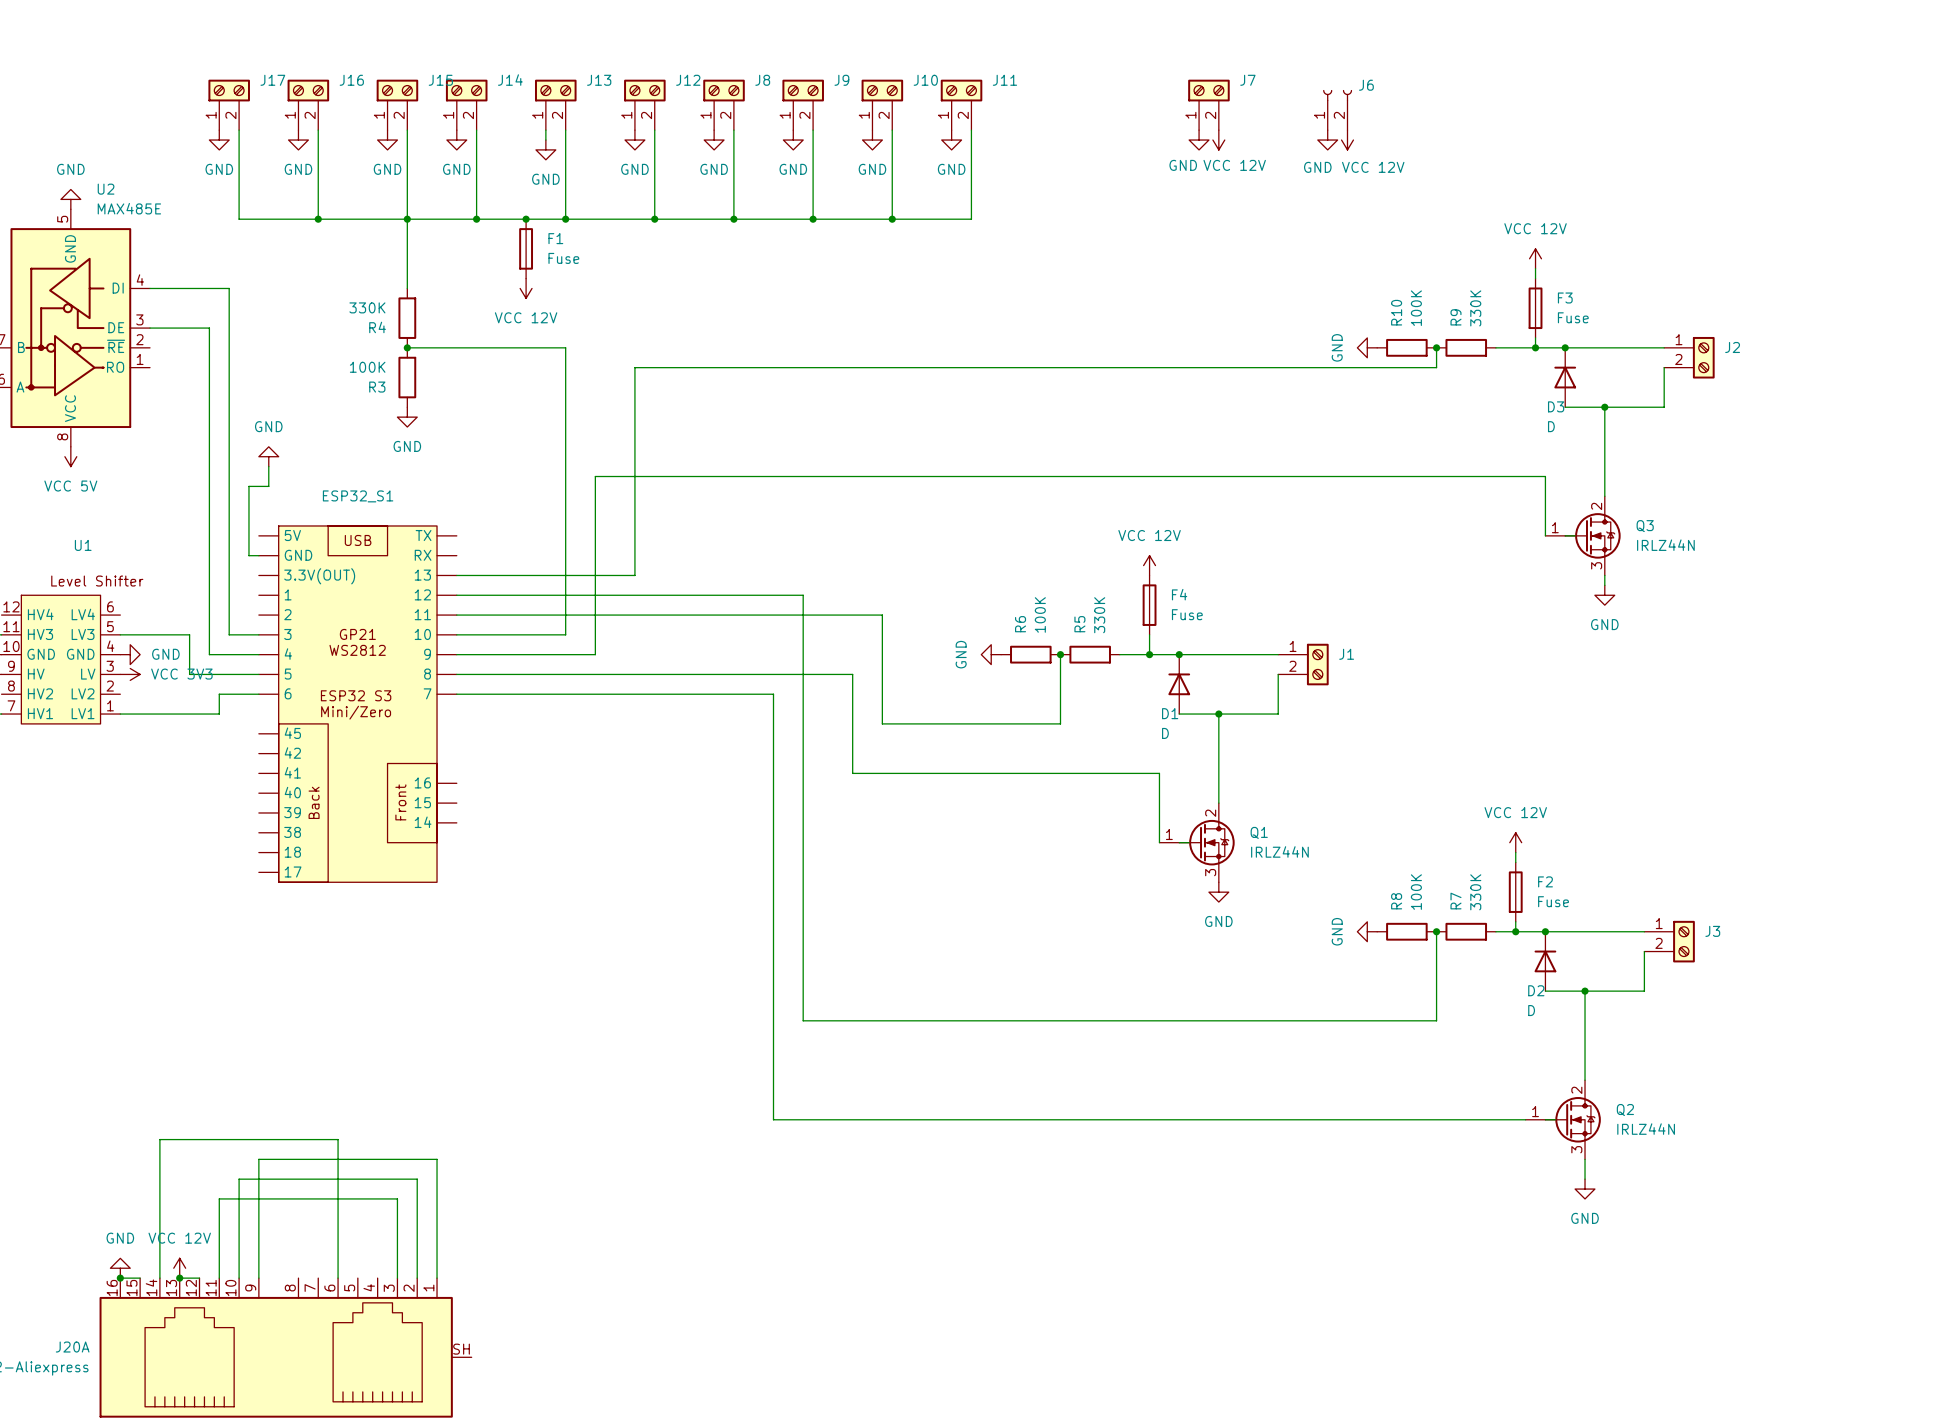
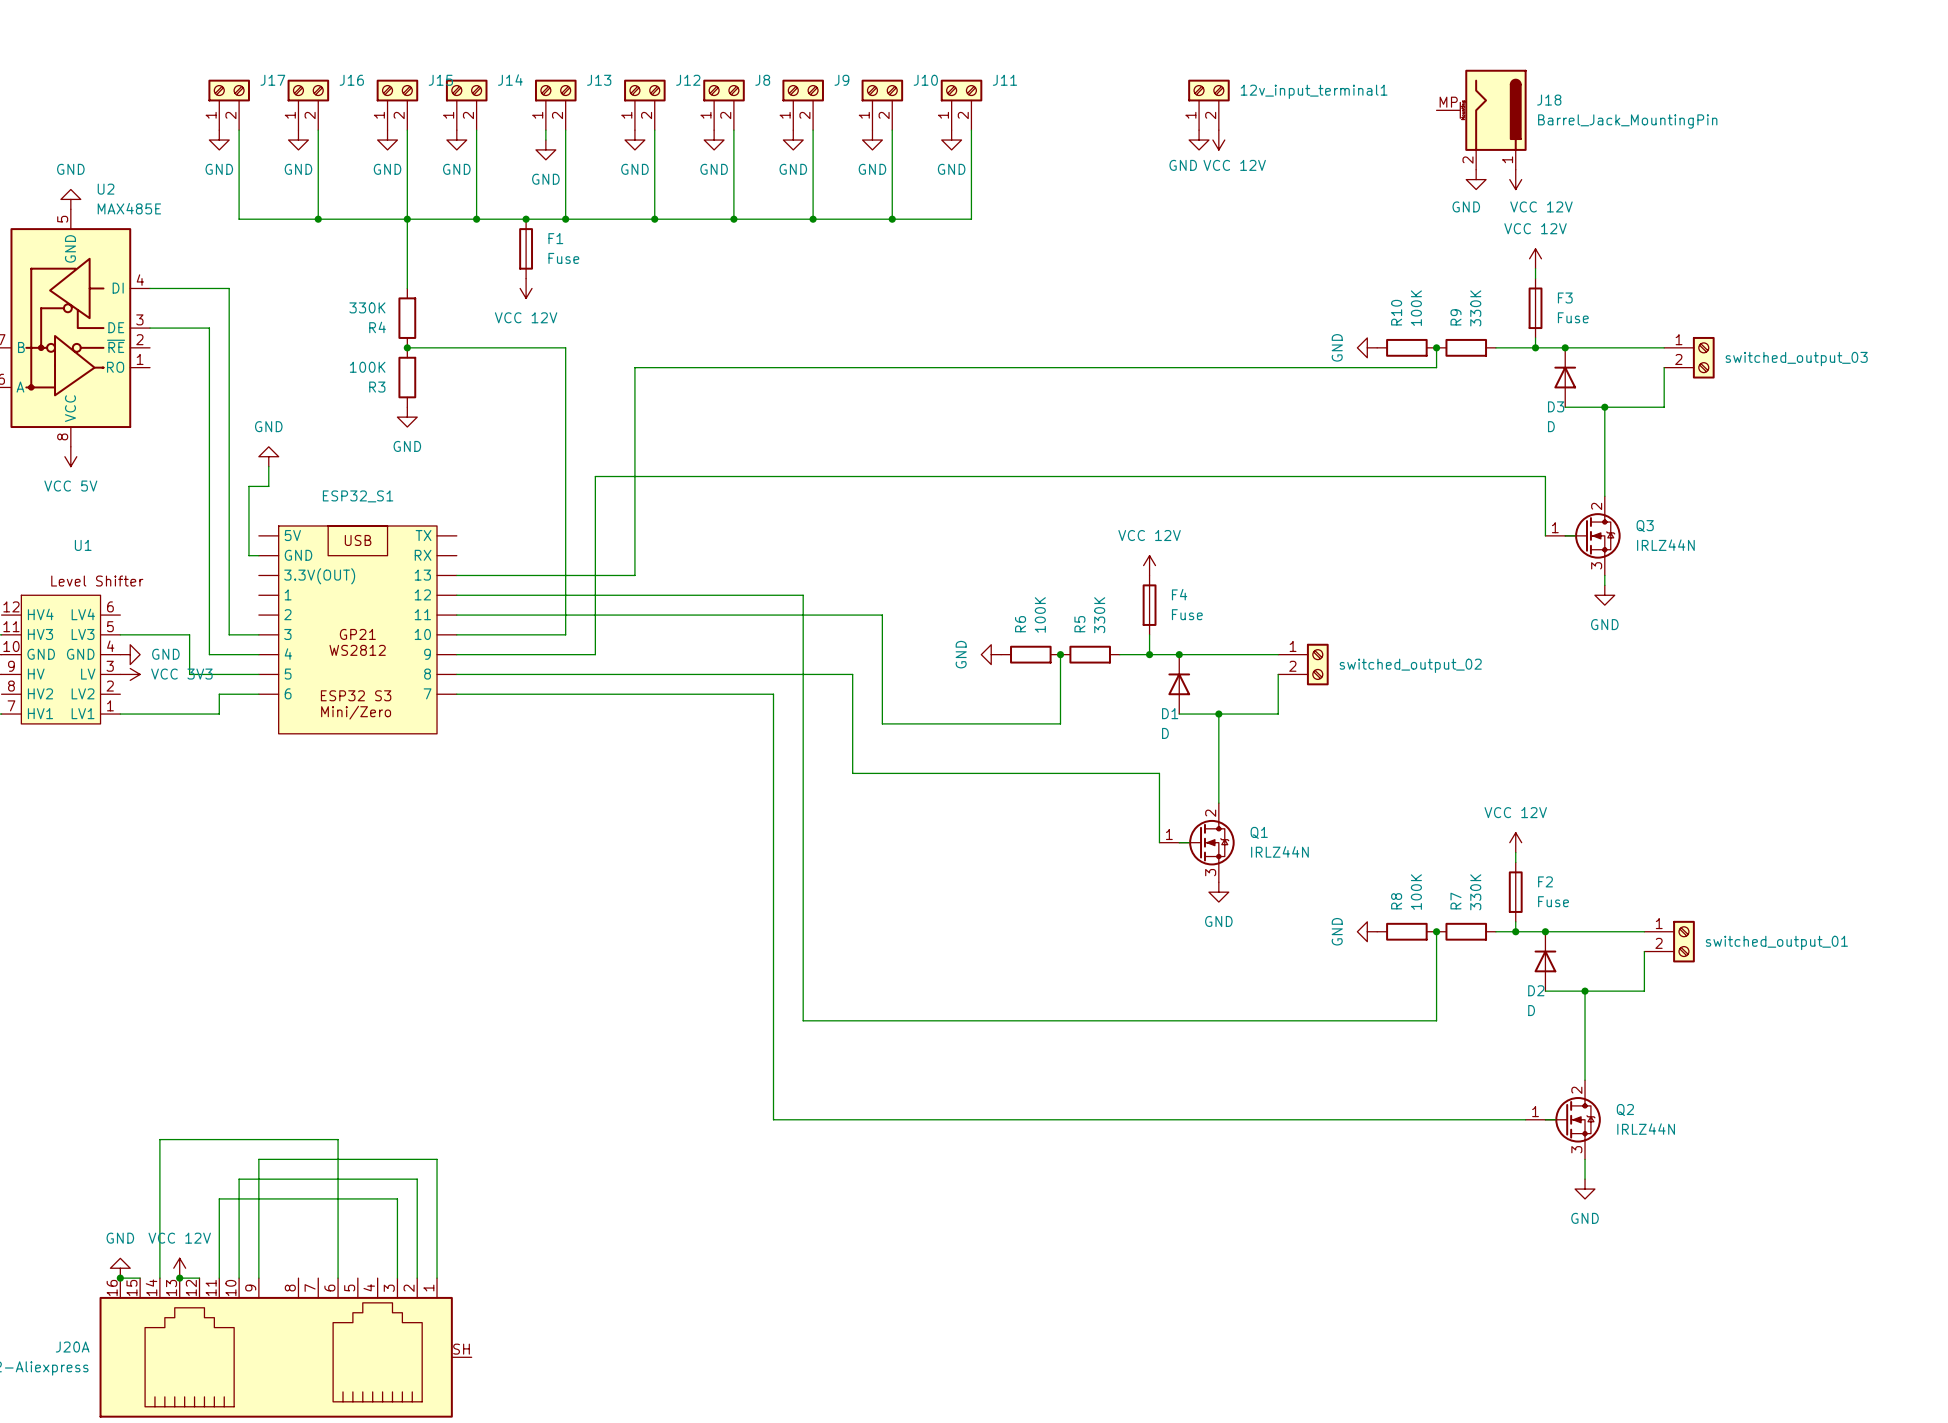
J7 name: J7 (1247, 80) -> 12v_input_terminal1 (1314, 91)
J6: (1337, 110) -> none
J18: none -> Barrel_Jack_MountingPin (1481, 119)
power symbol position: GND (1327, 140) -> GND (1476, 179)
power symbol position: VCC 12V (1347, 140) -> VCC 12V (1515, 179)
J2 name: J2 (1732, 347) -> switched_output_03 (1796, 359)
ESP32_S1 symbol: [258, 525, 457, 883] -> [258, 525, 457, 734]
J1 name: J1 (1346, 654) -> switched_output_02 (1410, 665)
J3 name: J3 (1712, 931) -> switched_output_01 (1776, 942)

